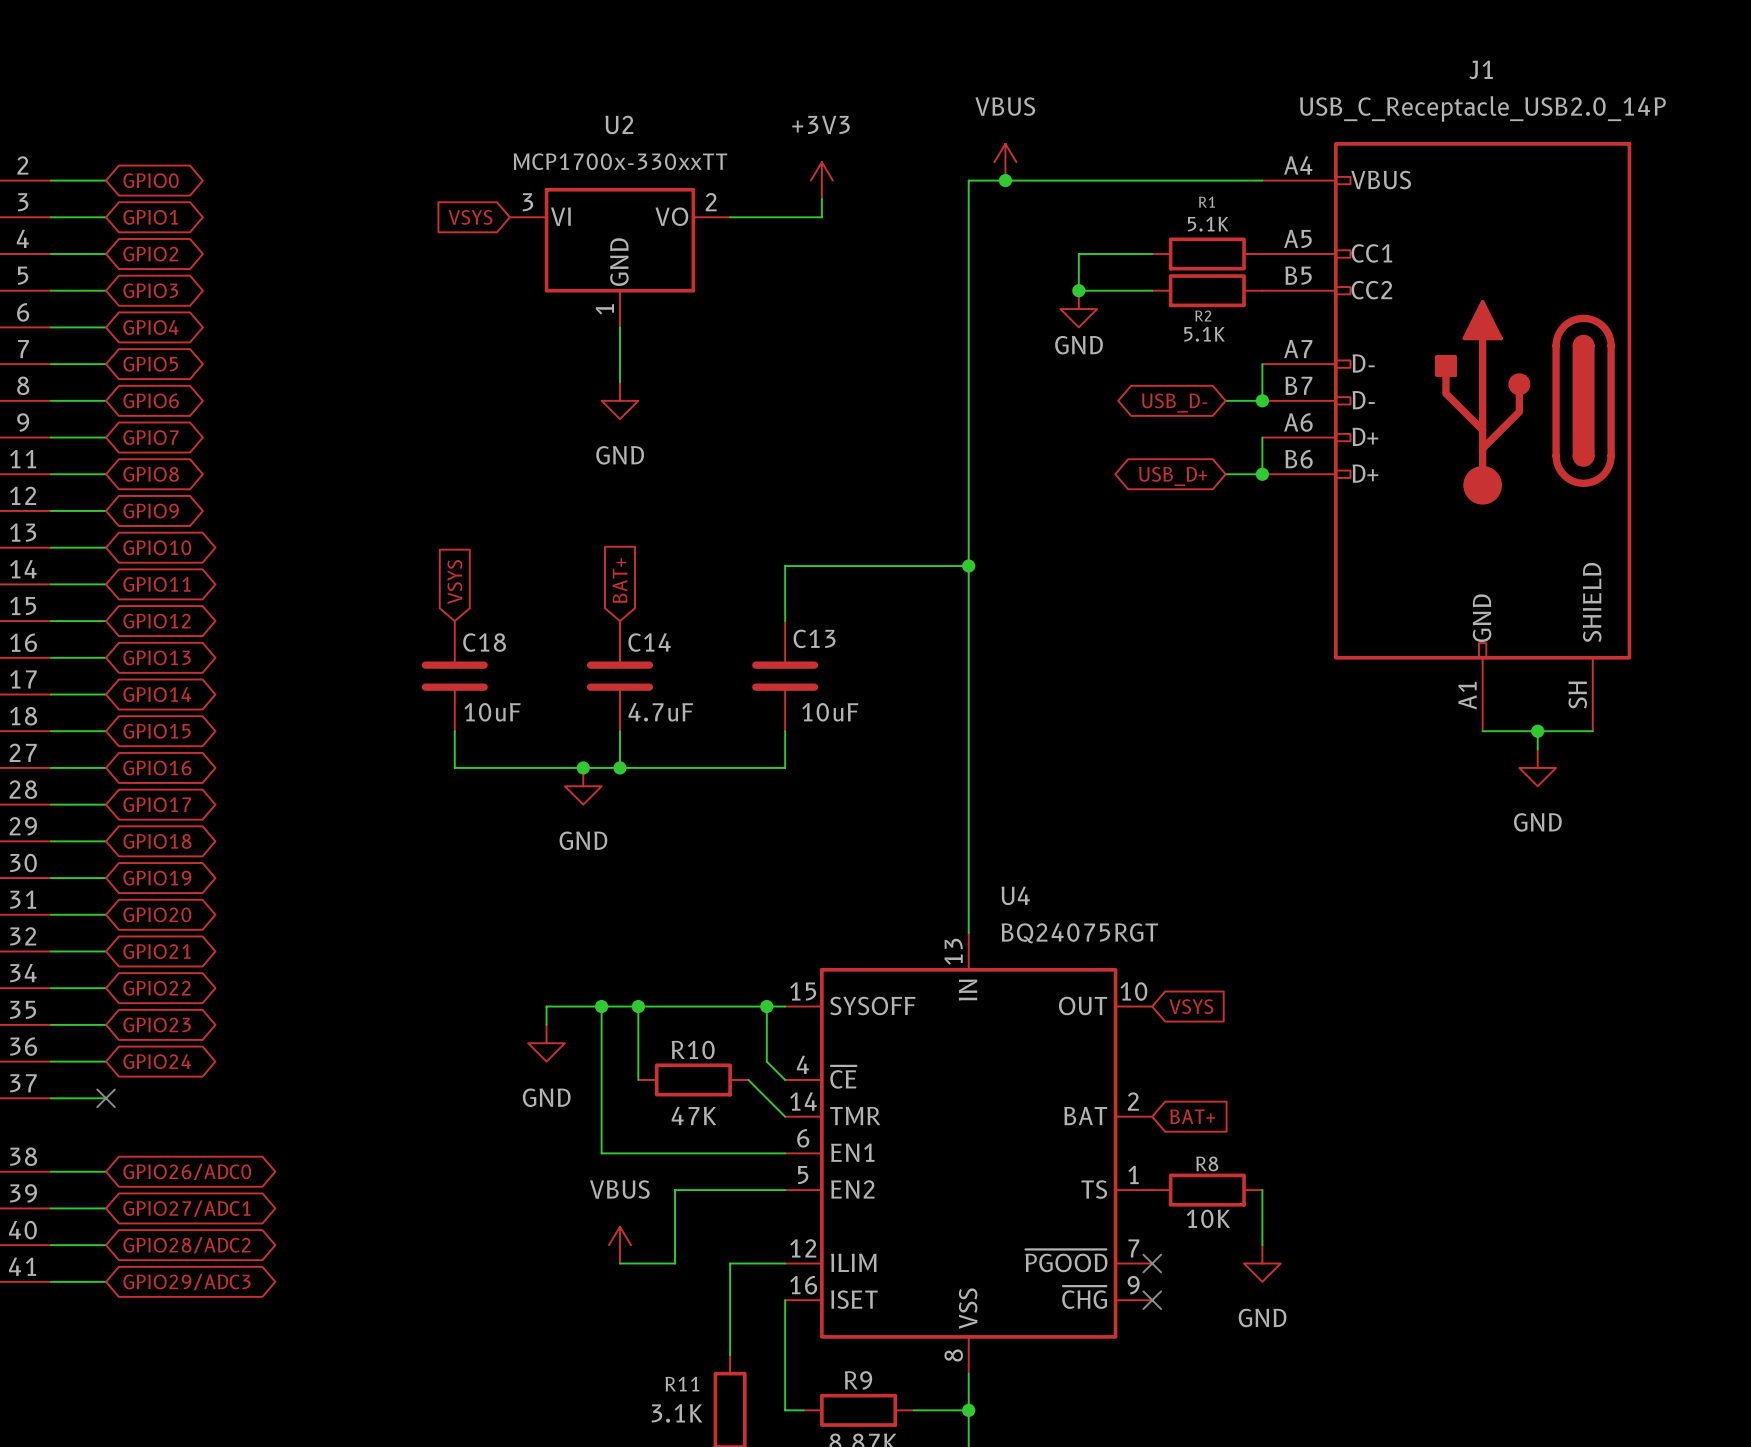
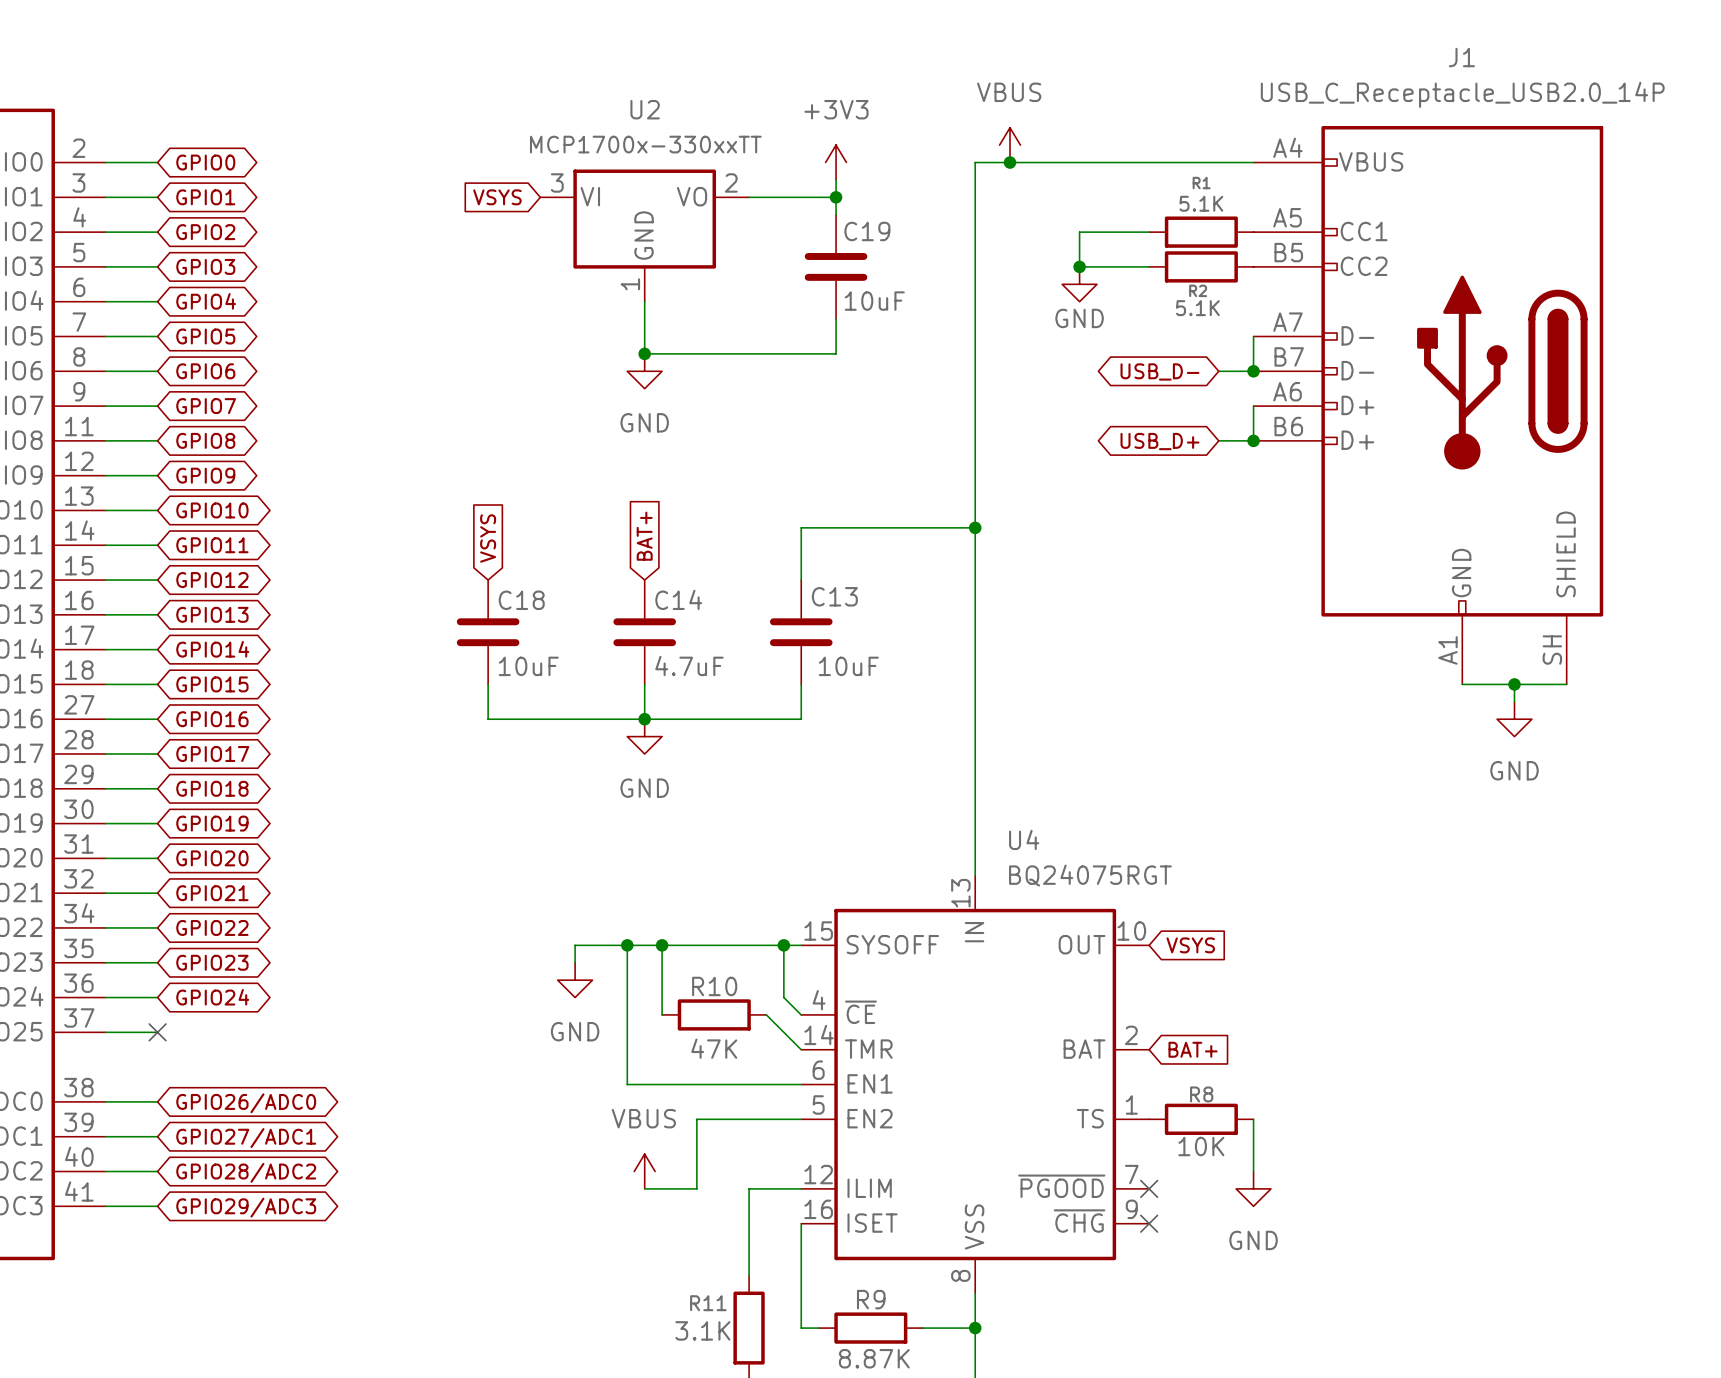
wire: none -> (836, 197) (836, 214)
junction: none -> (836, 197)
C19: none -> 10uF (836, 266)
wire: none -> (836, 319) (836, 353) (644, 353)
junction: none -> (644, 353)
junction: (583, 767) -> none
power symbol position: GND (583, 786) -> GND (644, 736)

